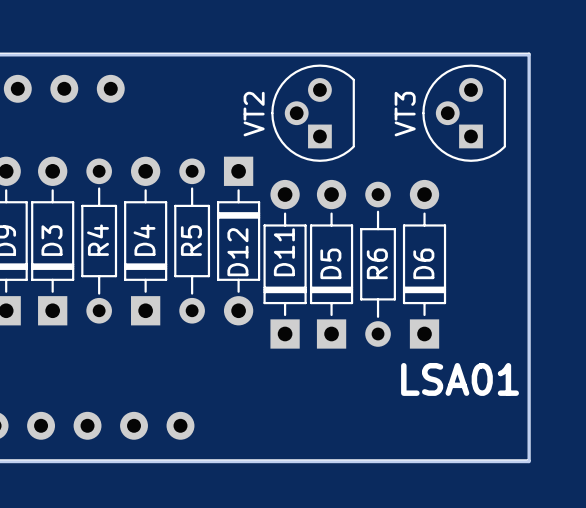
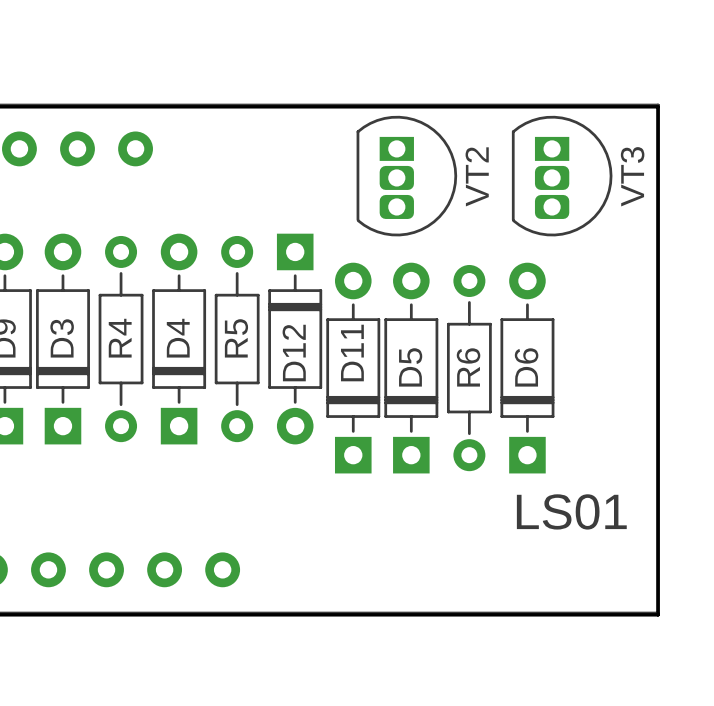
VT2 footprint: [271, 64, 355, 162] -> [356, 115, 458, 237]
VT3 footprint: [422, 64, 506, 162] -> [511, 115, 613, 237]
VT2 name position: VT2 (254, 114) -> VT2 (477, 176)
VT3 name position: VT3 (405, 114) -> VT3 (632, 176)
text: LSA01 (460, 379) -> LS01 (571, 511)

